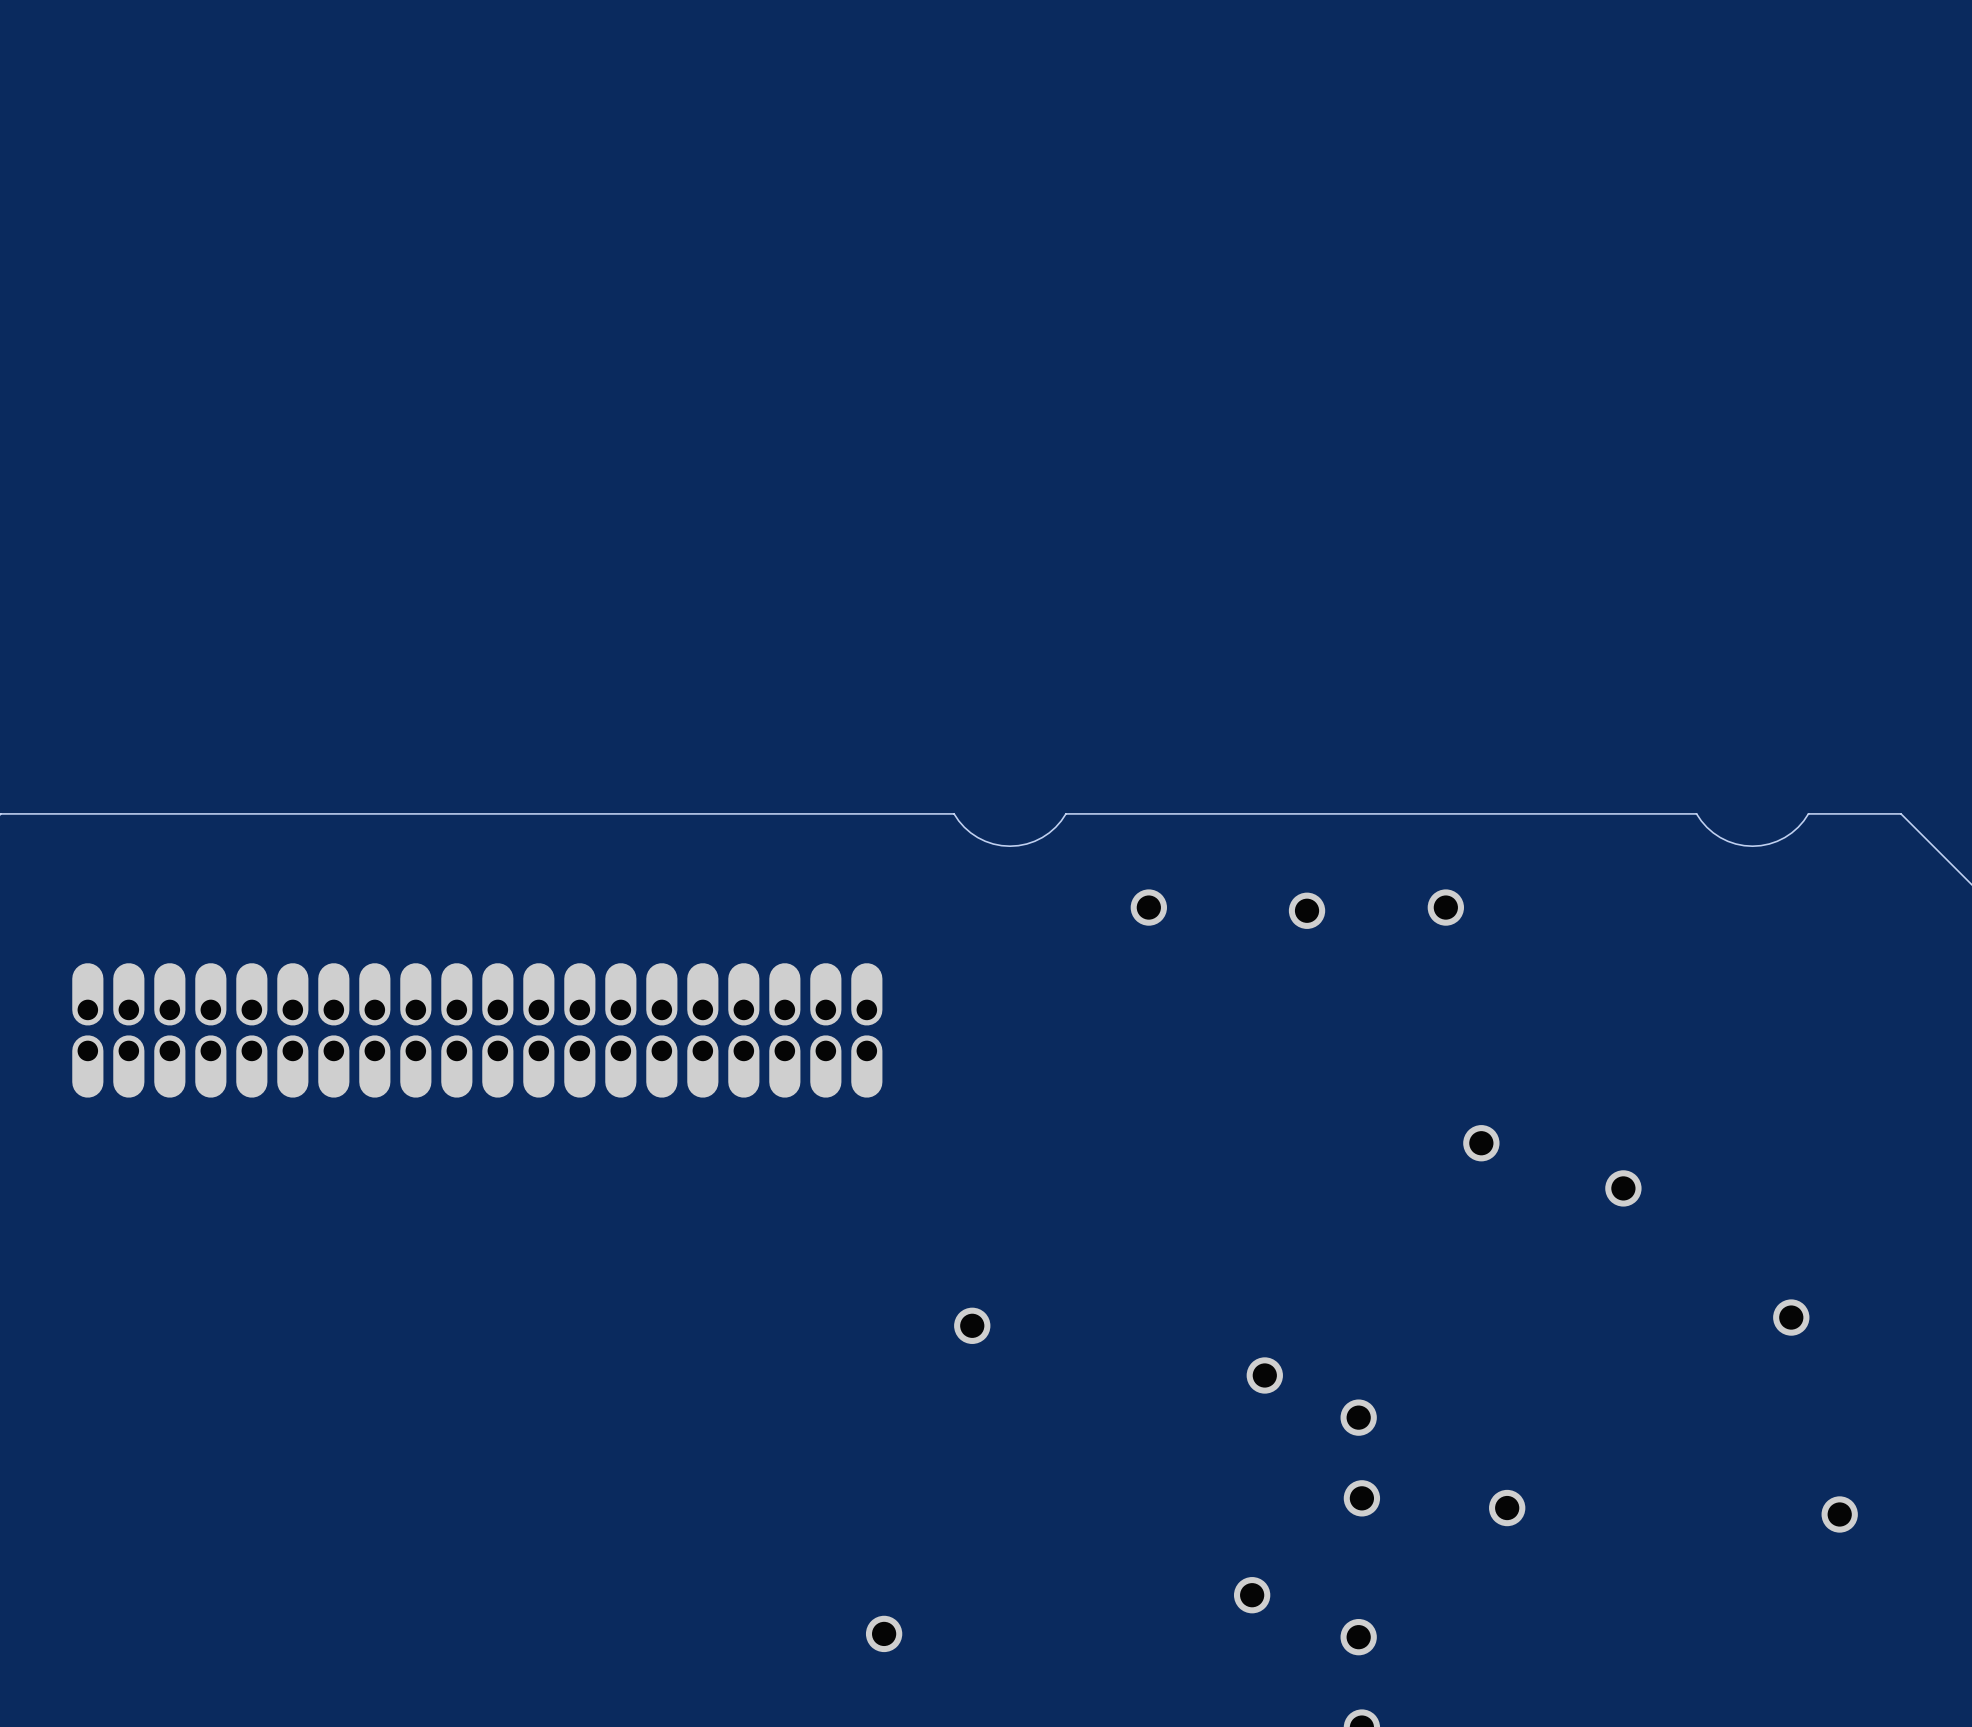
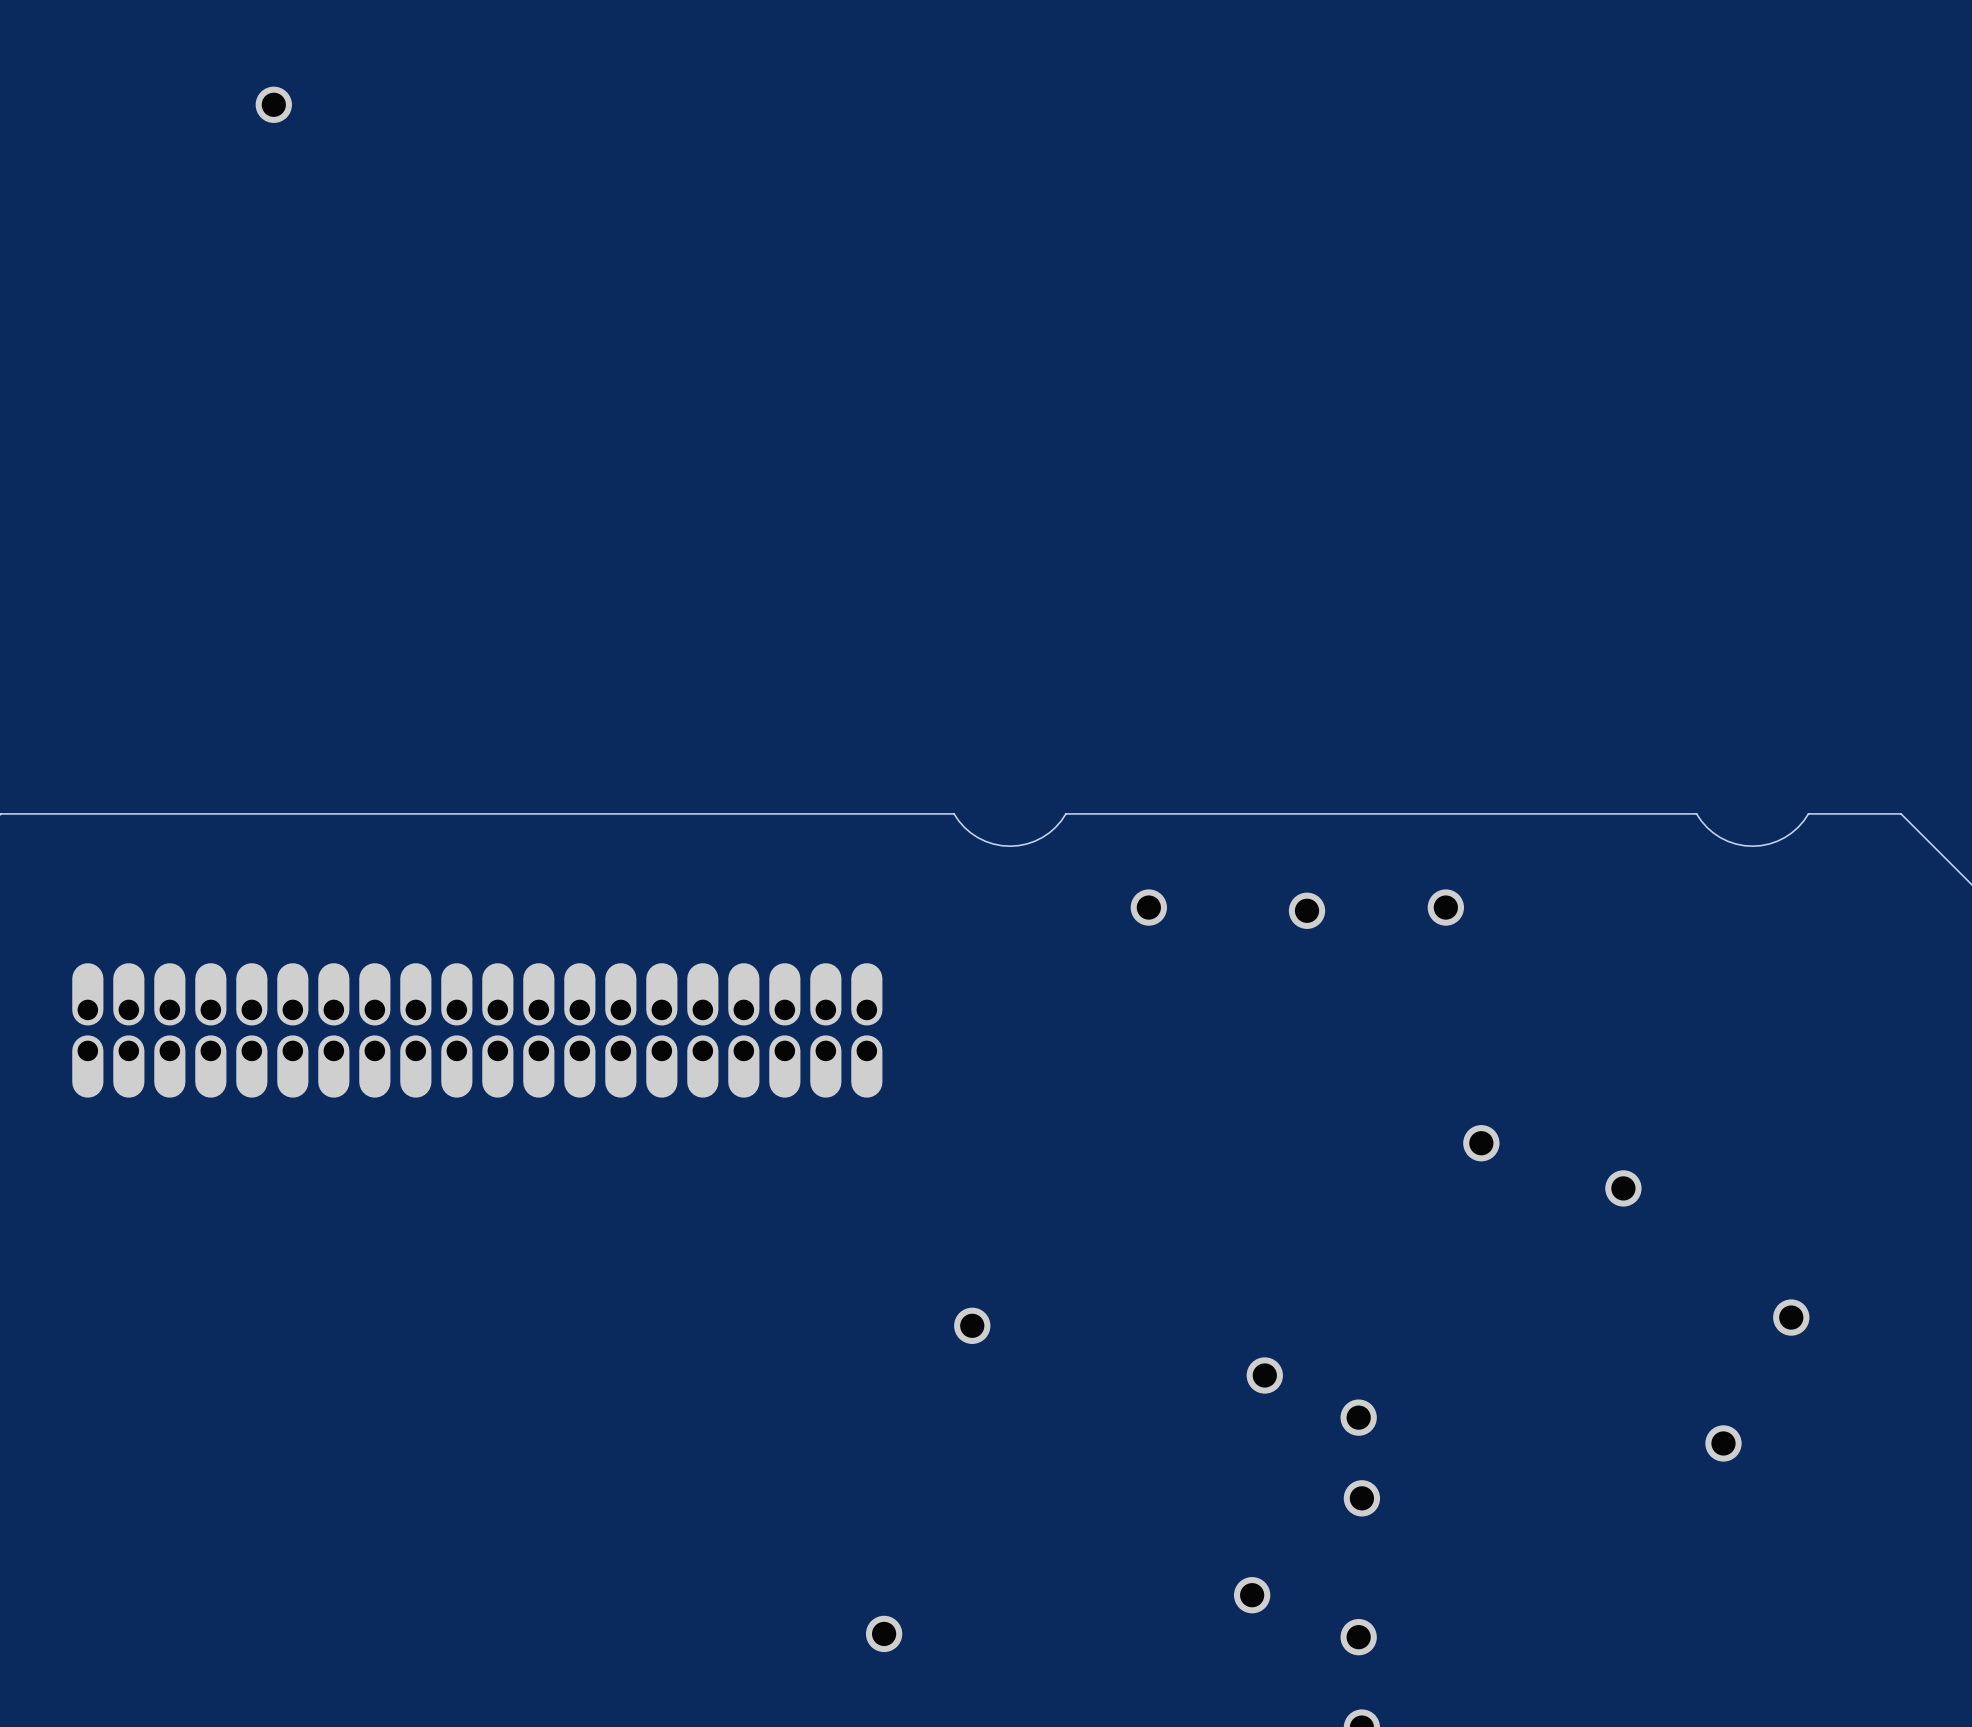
part: none -> (273, 104)
part: none -> (1723, 1443)
part: (1507, 1508) -> none
part: (1839, 1514) -> none

